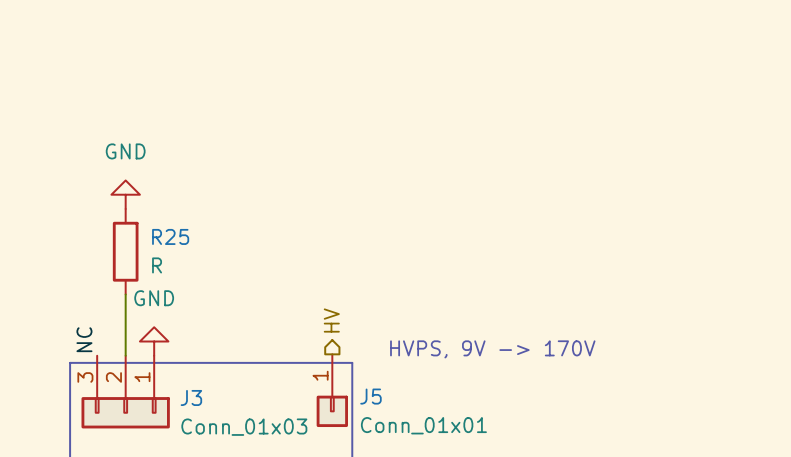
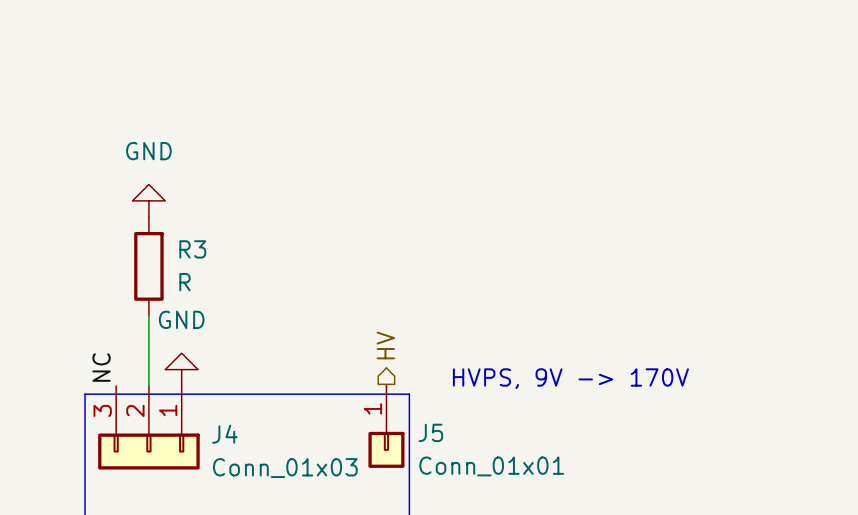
R25 name: R25 (170, 236) -> R3 (192, 249)
J3 name: J3 (191, 397) -> J4 (224, 434)

